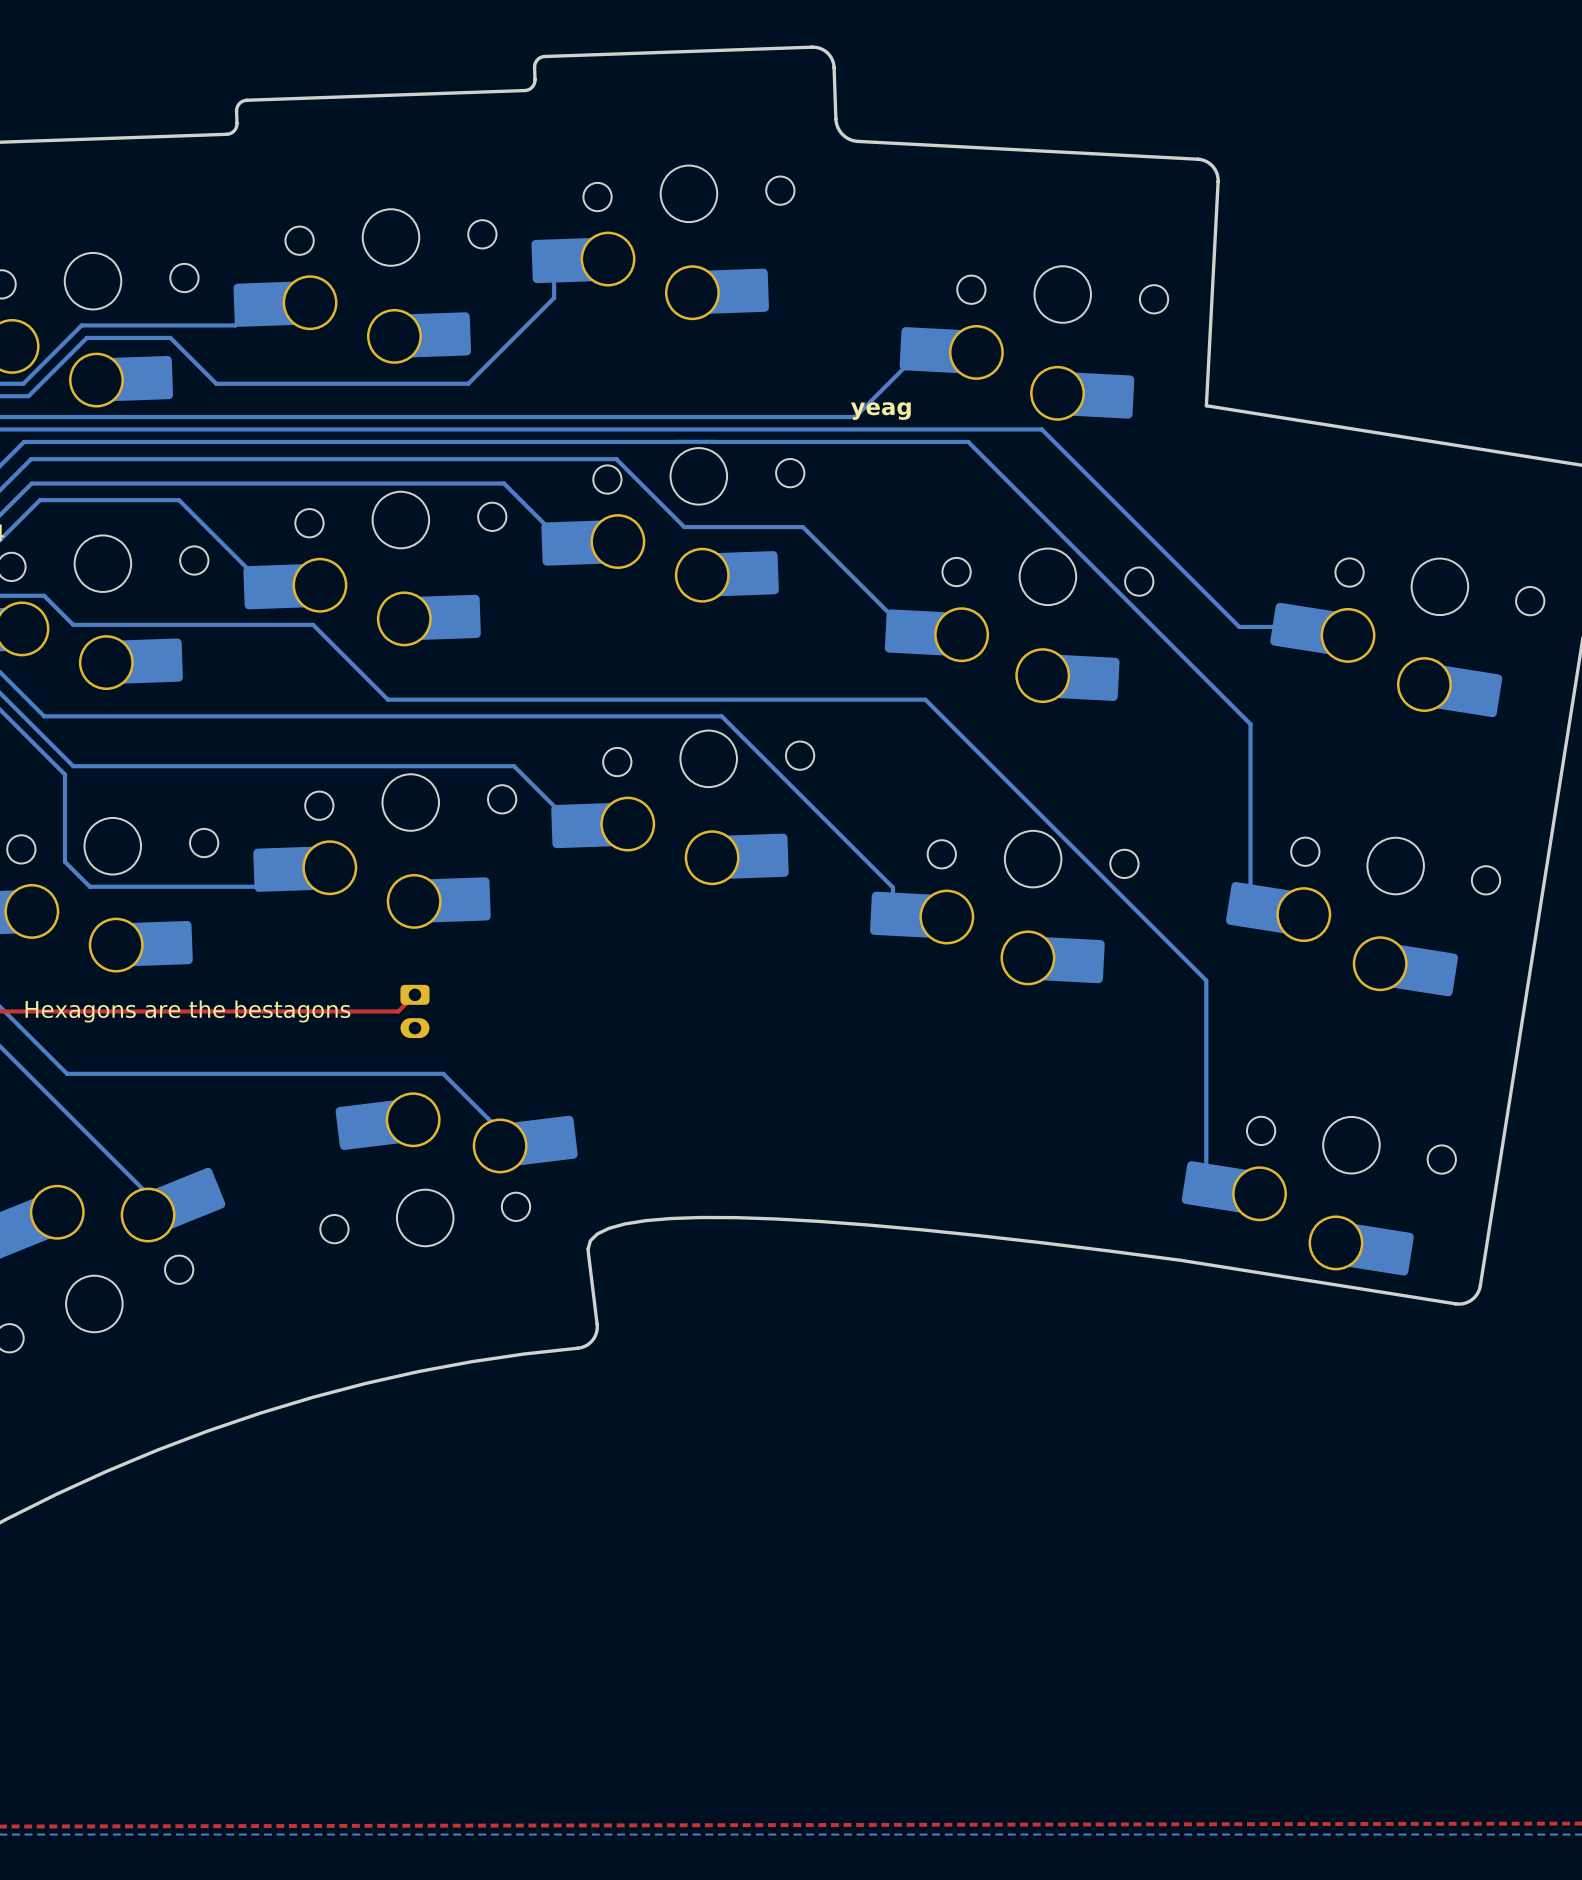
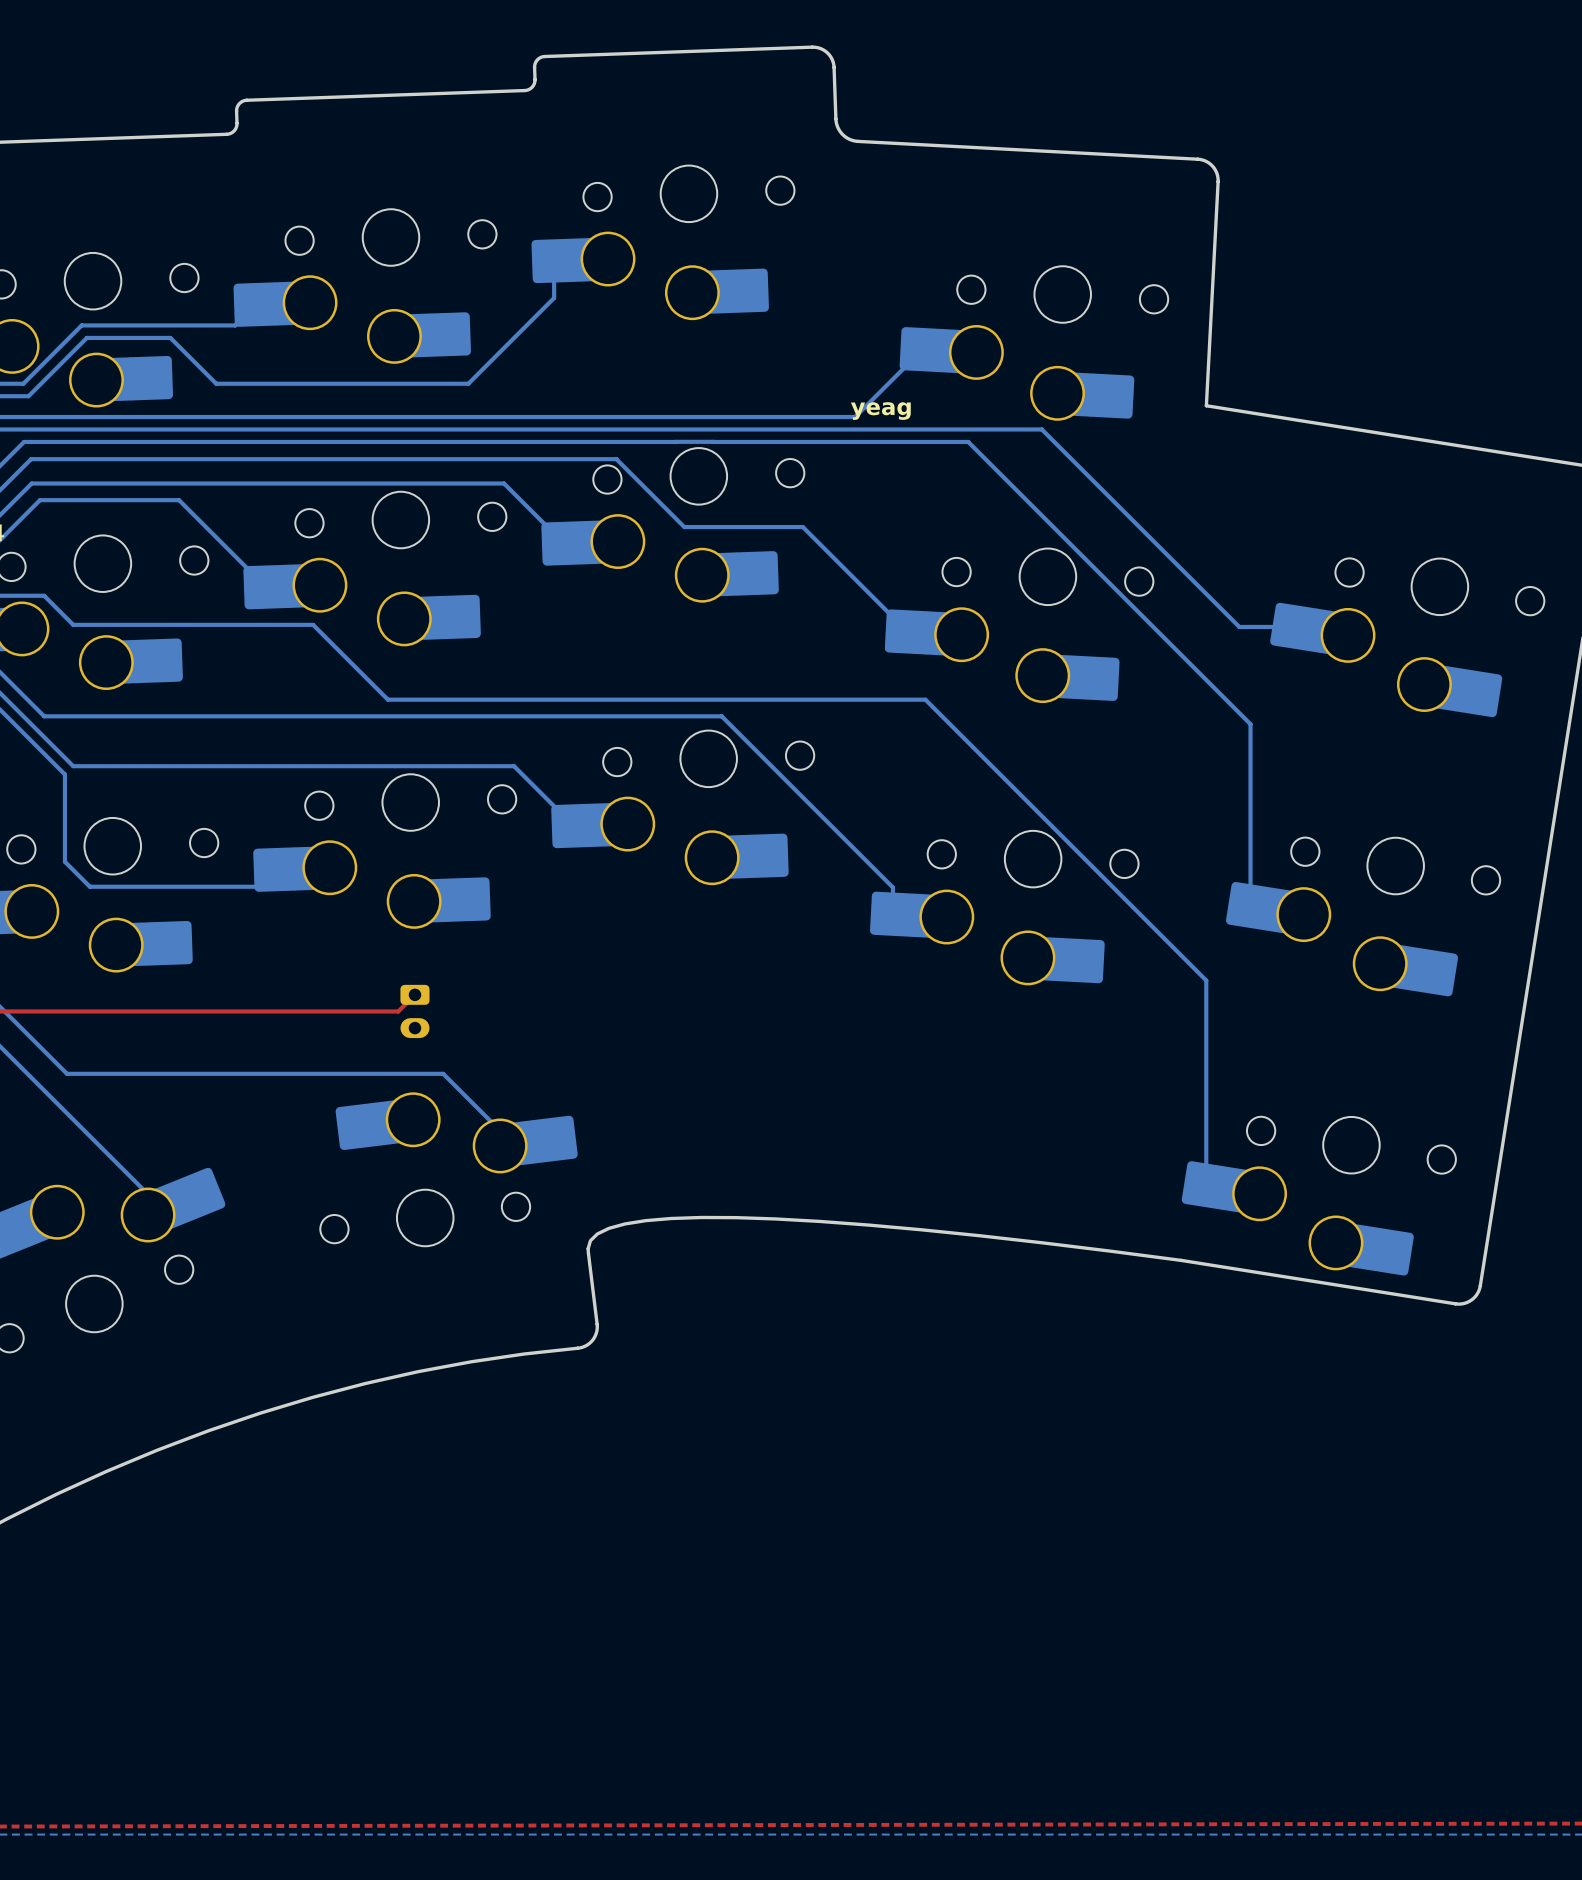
text: Hexagons are the bestagons (187, 1011) -> none

